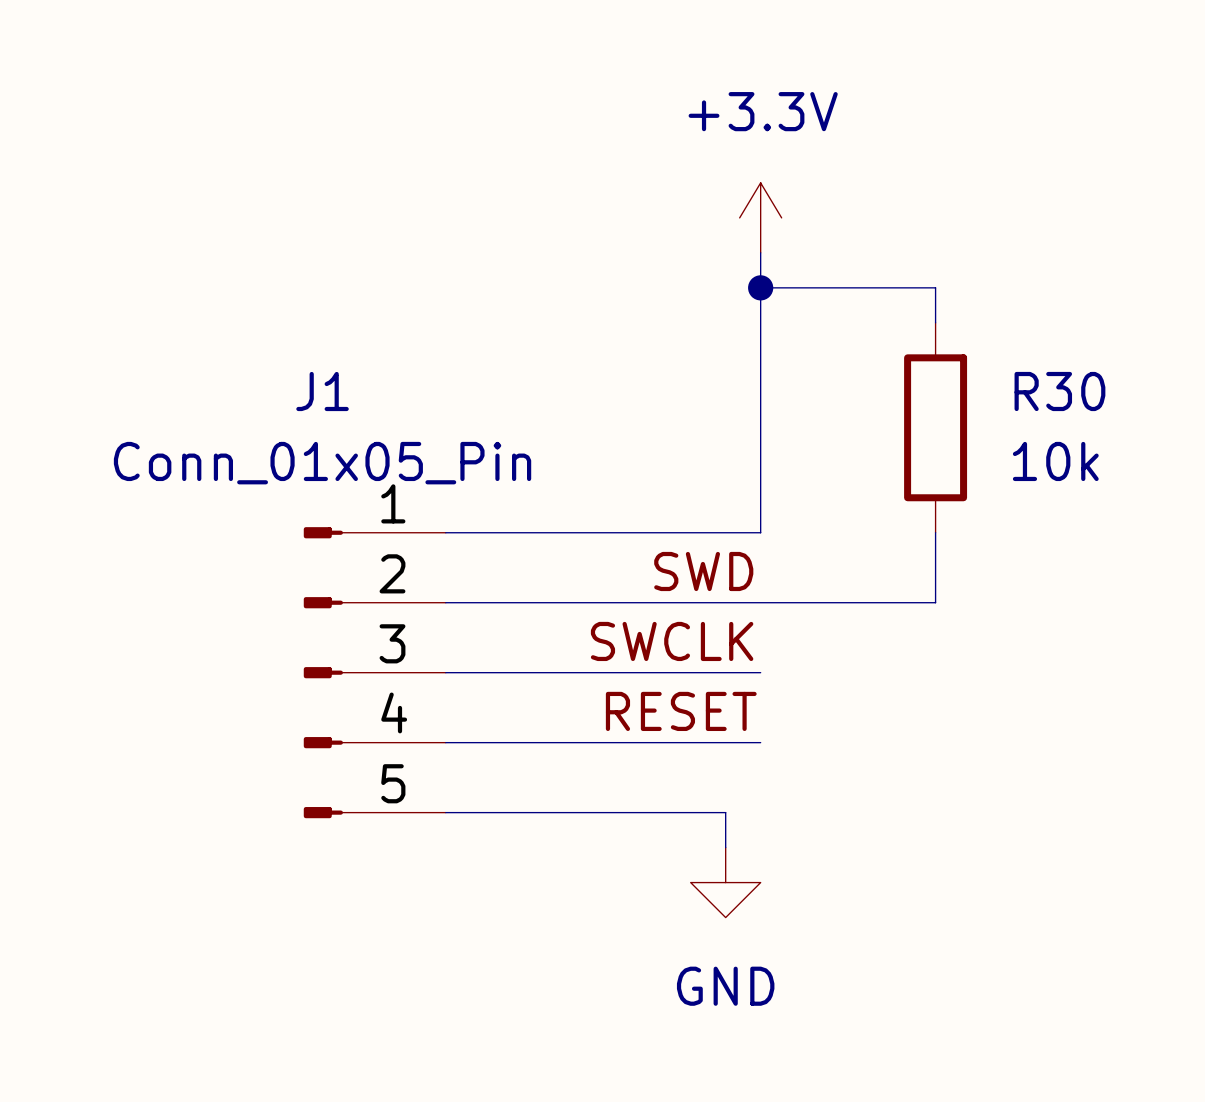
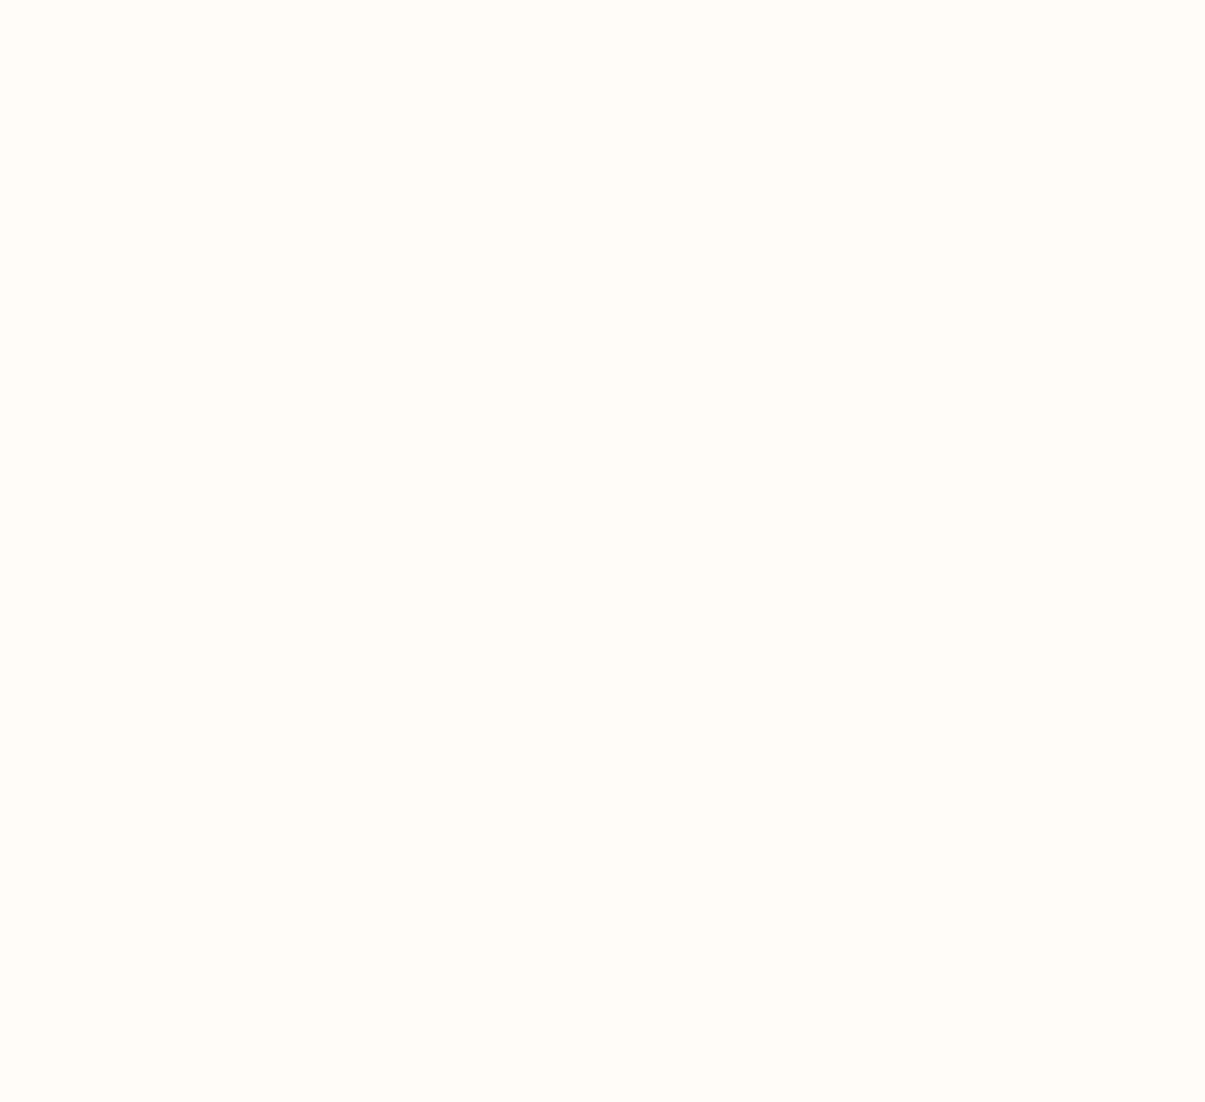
power symbol: +3.3V (760, 217) -> none
wire: (760, 252) (760, 532) (445, 532) -> none
wire: (760, 287) (935, 287) (935, 322) -> none
junction: (760, 287) -> none
R30: 10k (935, 427) -> none
wire: (935, 532) (935, 602) (445, 602) -> none
label: SWD (703, 571) -> none
label: SWCLK (672, 641) -> none
J1: Conn_01x05_Pin (374, 672) -> none
wire: (445, 672) (760, 672) -> none
label: RESET (681, 711) -> none
wire: (445, 742) (760, 742) -> none
wire: (445, 812) (725, 812) (725, 847) -> none
power symbol: GND (725, 882) -> none

